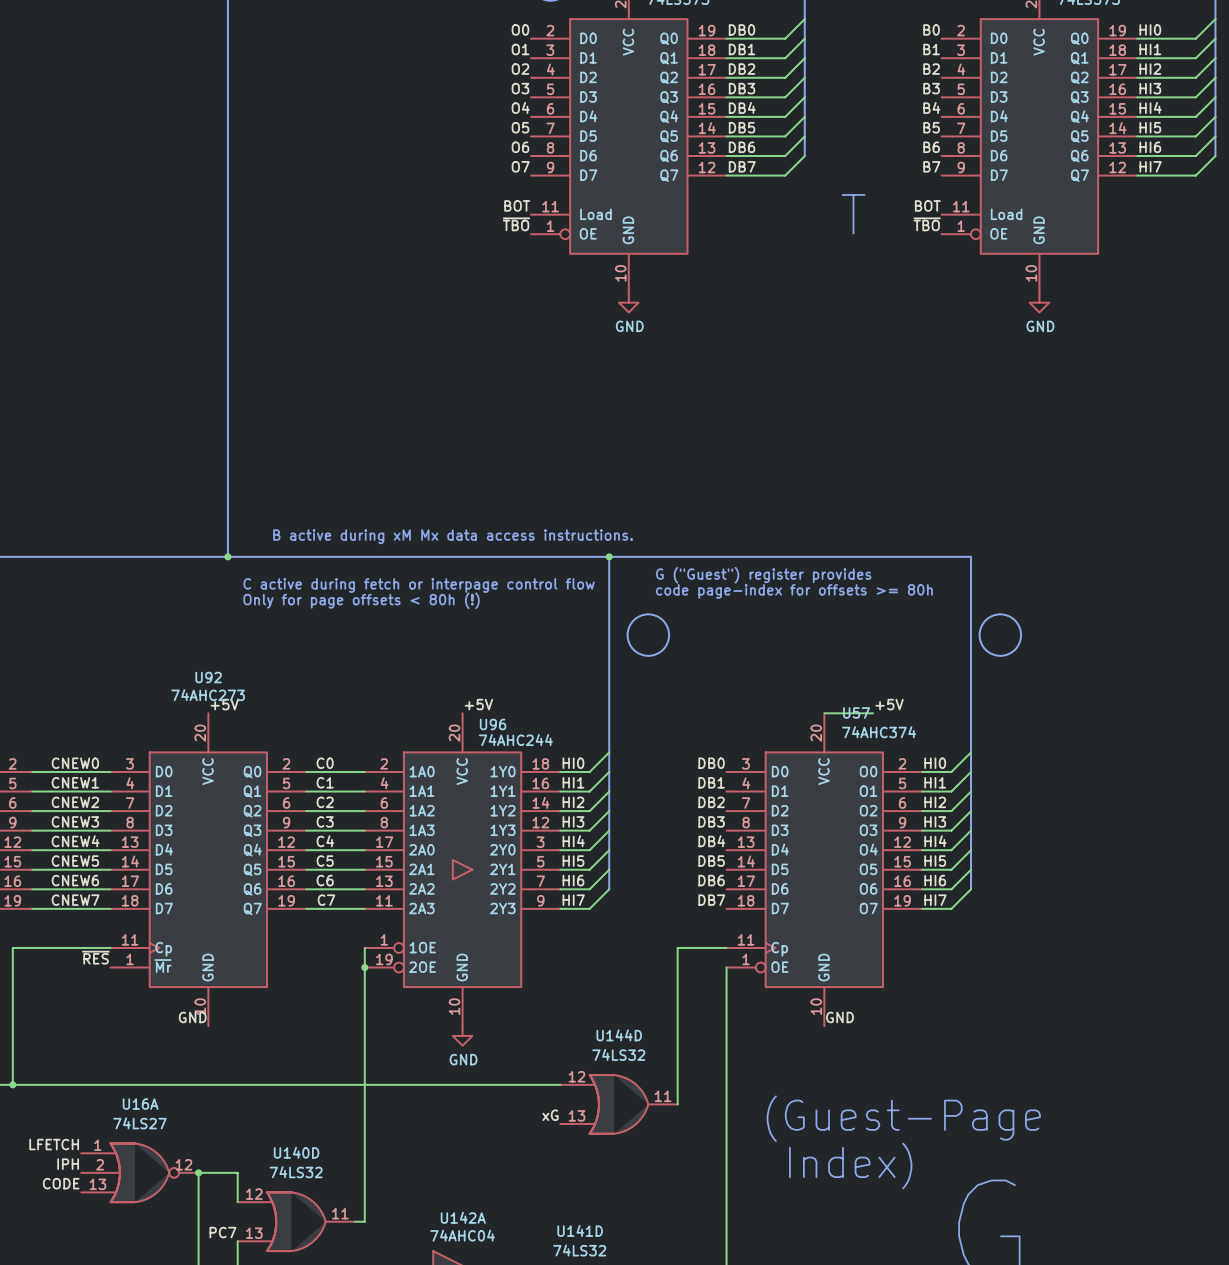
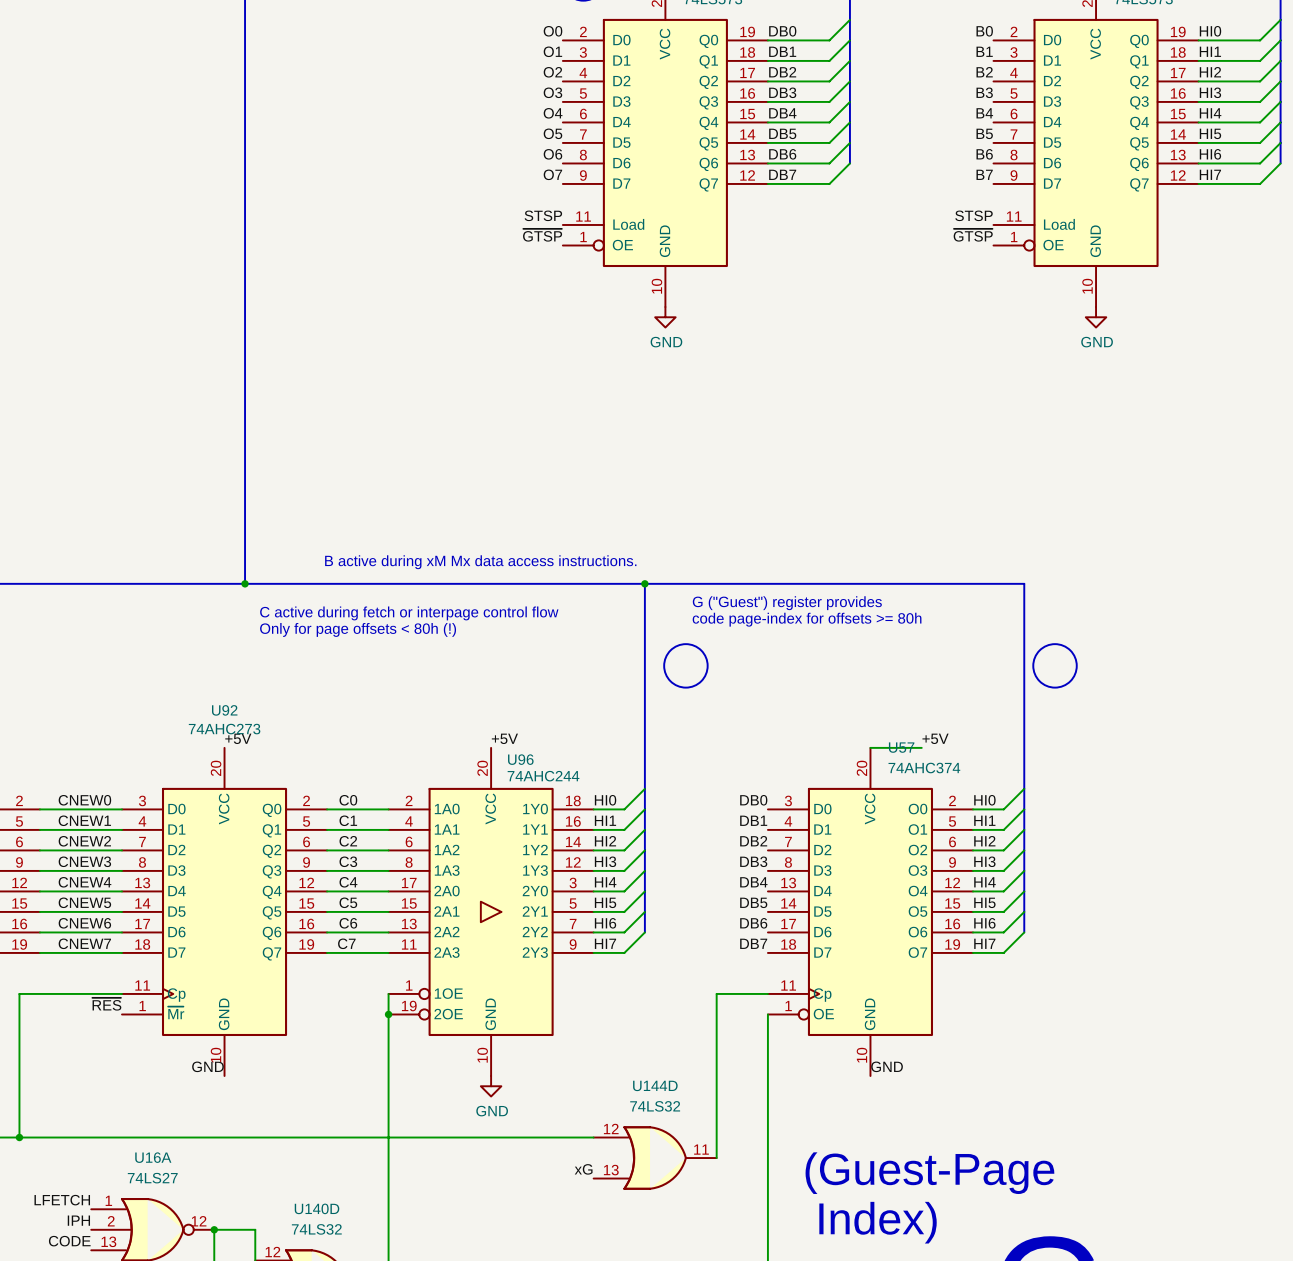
label: BOT (517, 205) -> STSP (543, 215)
label: BOT (927, 205) -> STSP (973, 215)
text: T (853, 214) -> none
label: ~{TBO} (516, 224) -> ~{GTSP} (542, 235)
label: ~{TBO} (927, 224) -> ~{GTSP} (973, 235)

